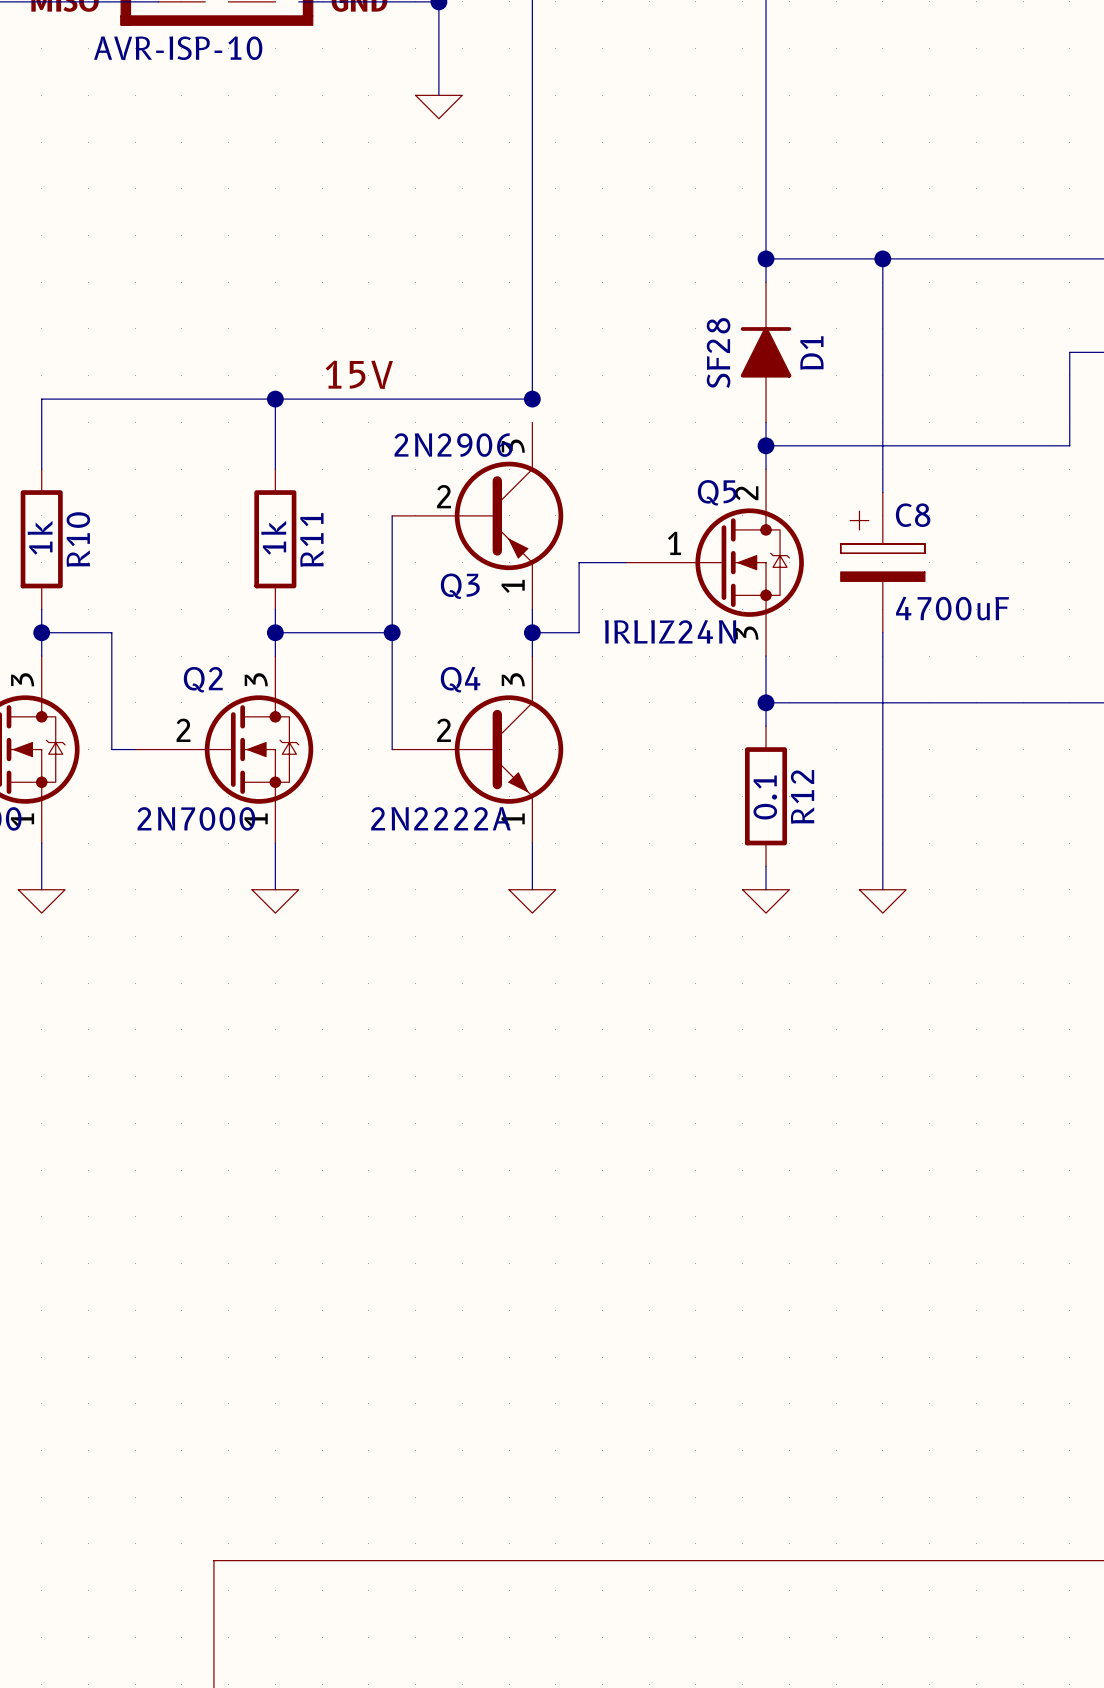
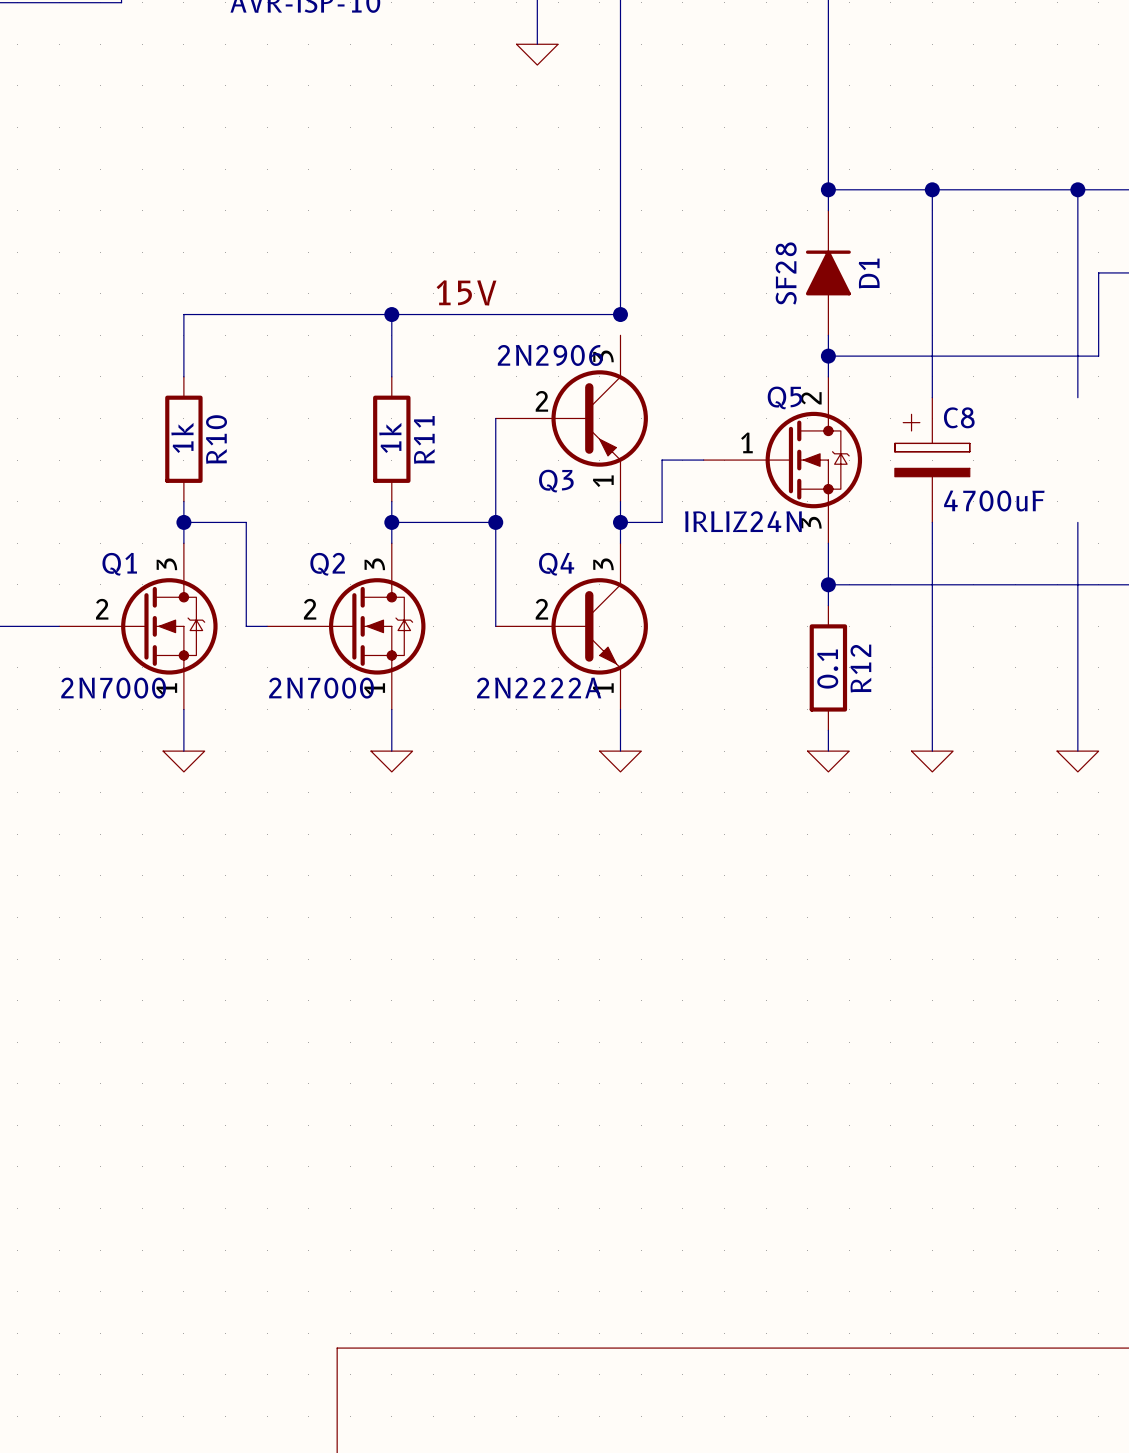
wire: none -> (1077, 189) (1077, 397)
junction: none -> (1077, 189)
wire: none -> (1077, 522) (1077, 751)
power symbol: none -> (1077, 761)

